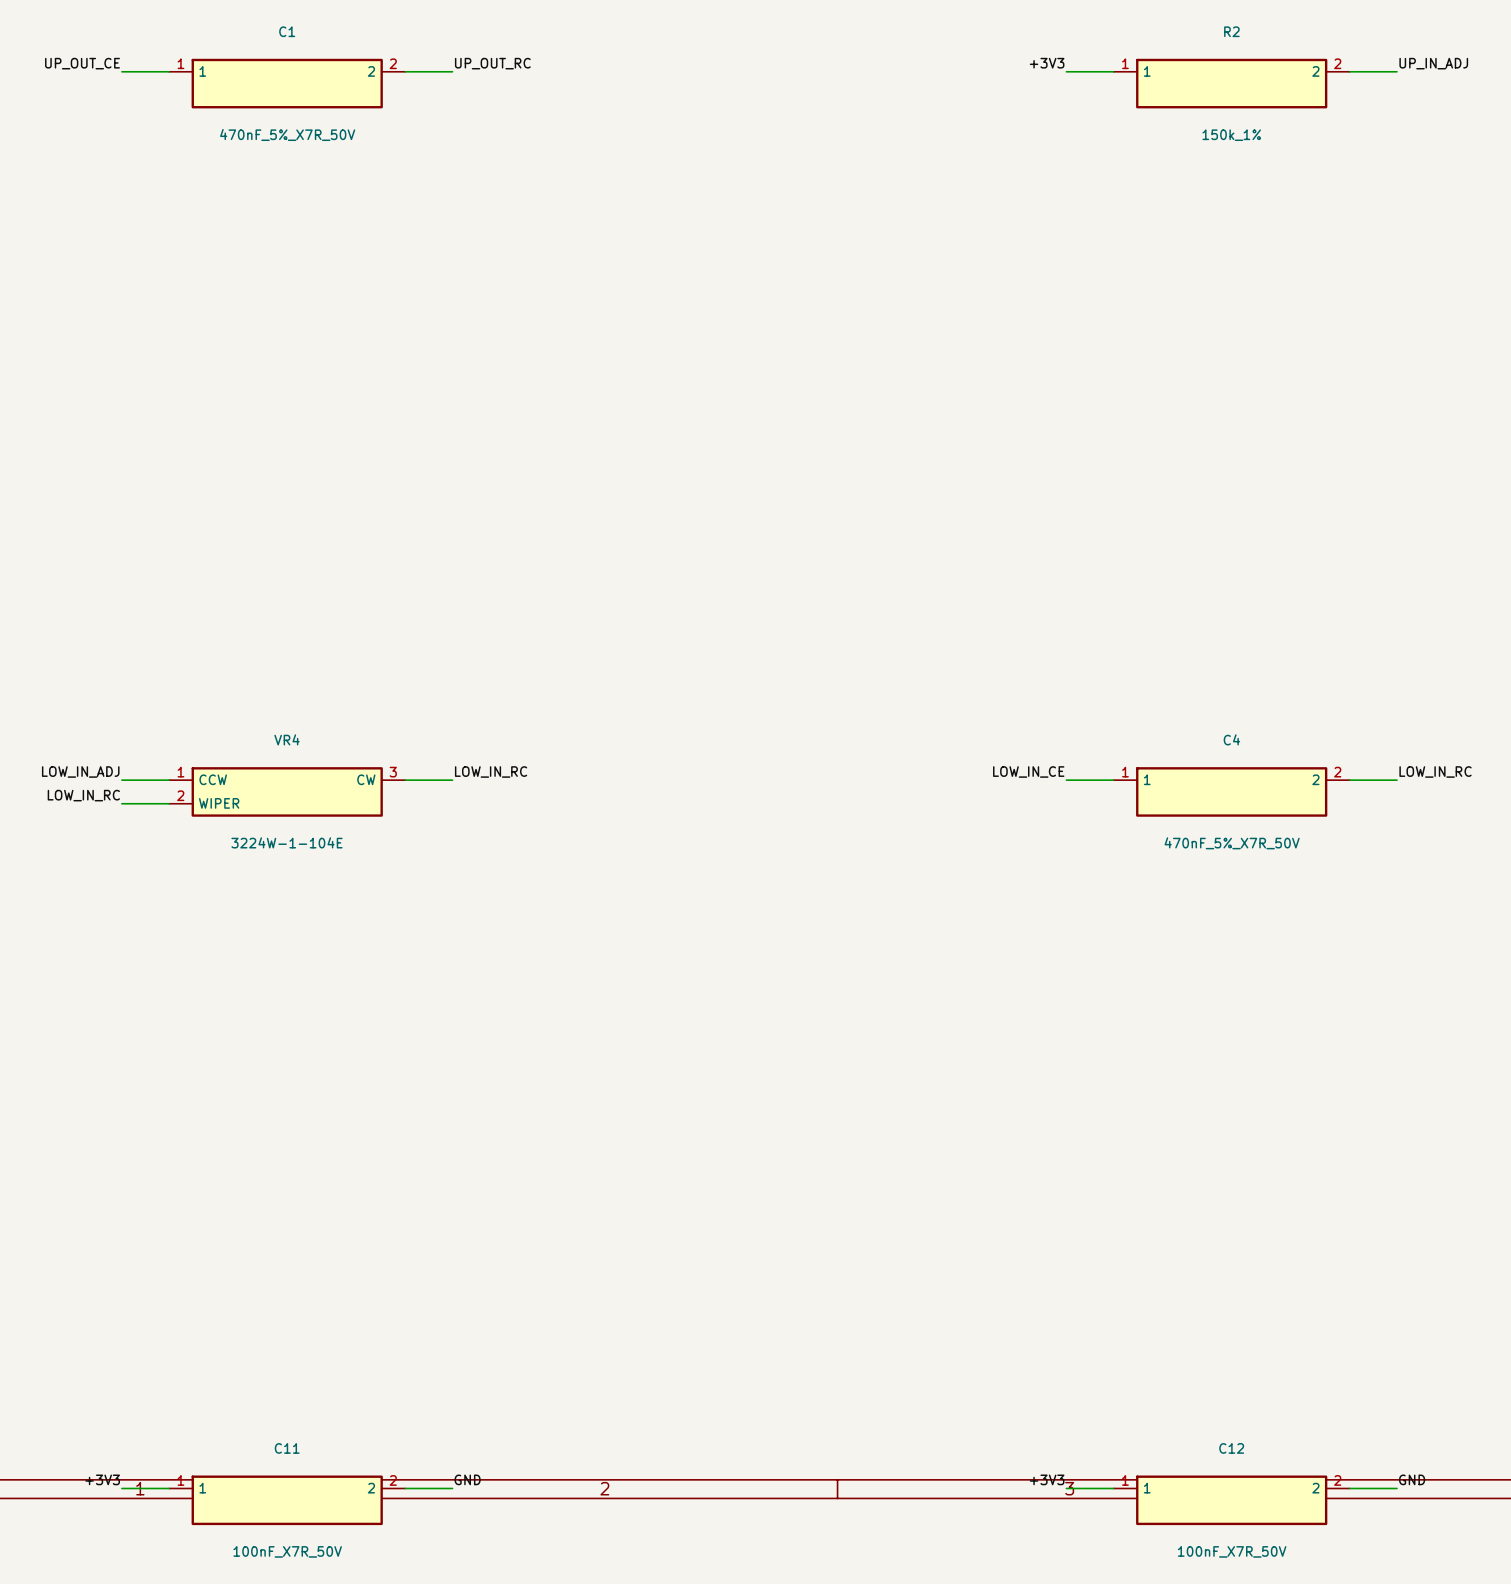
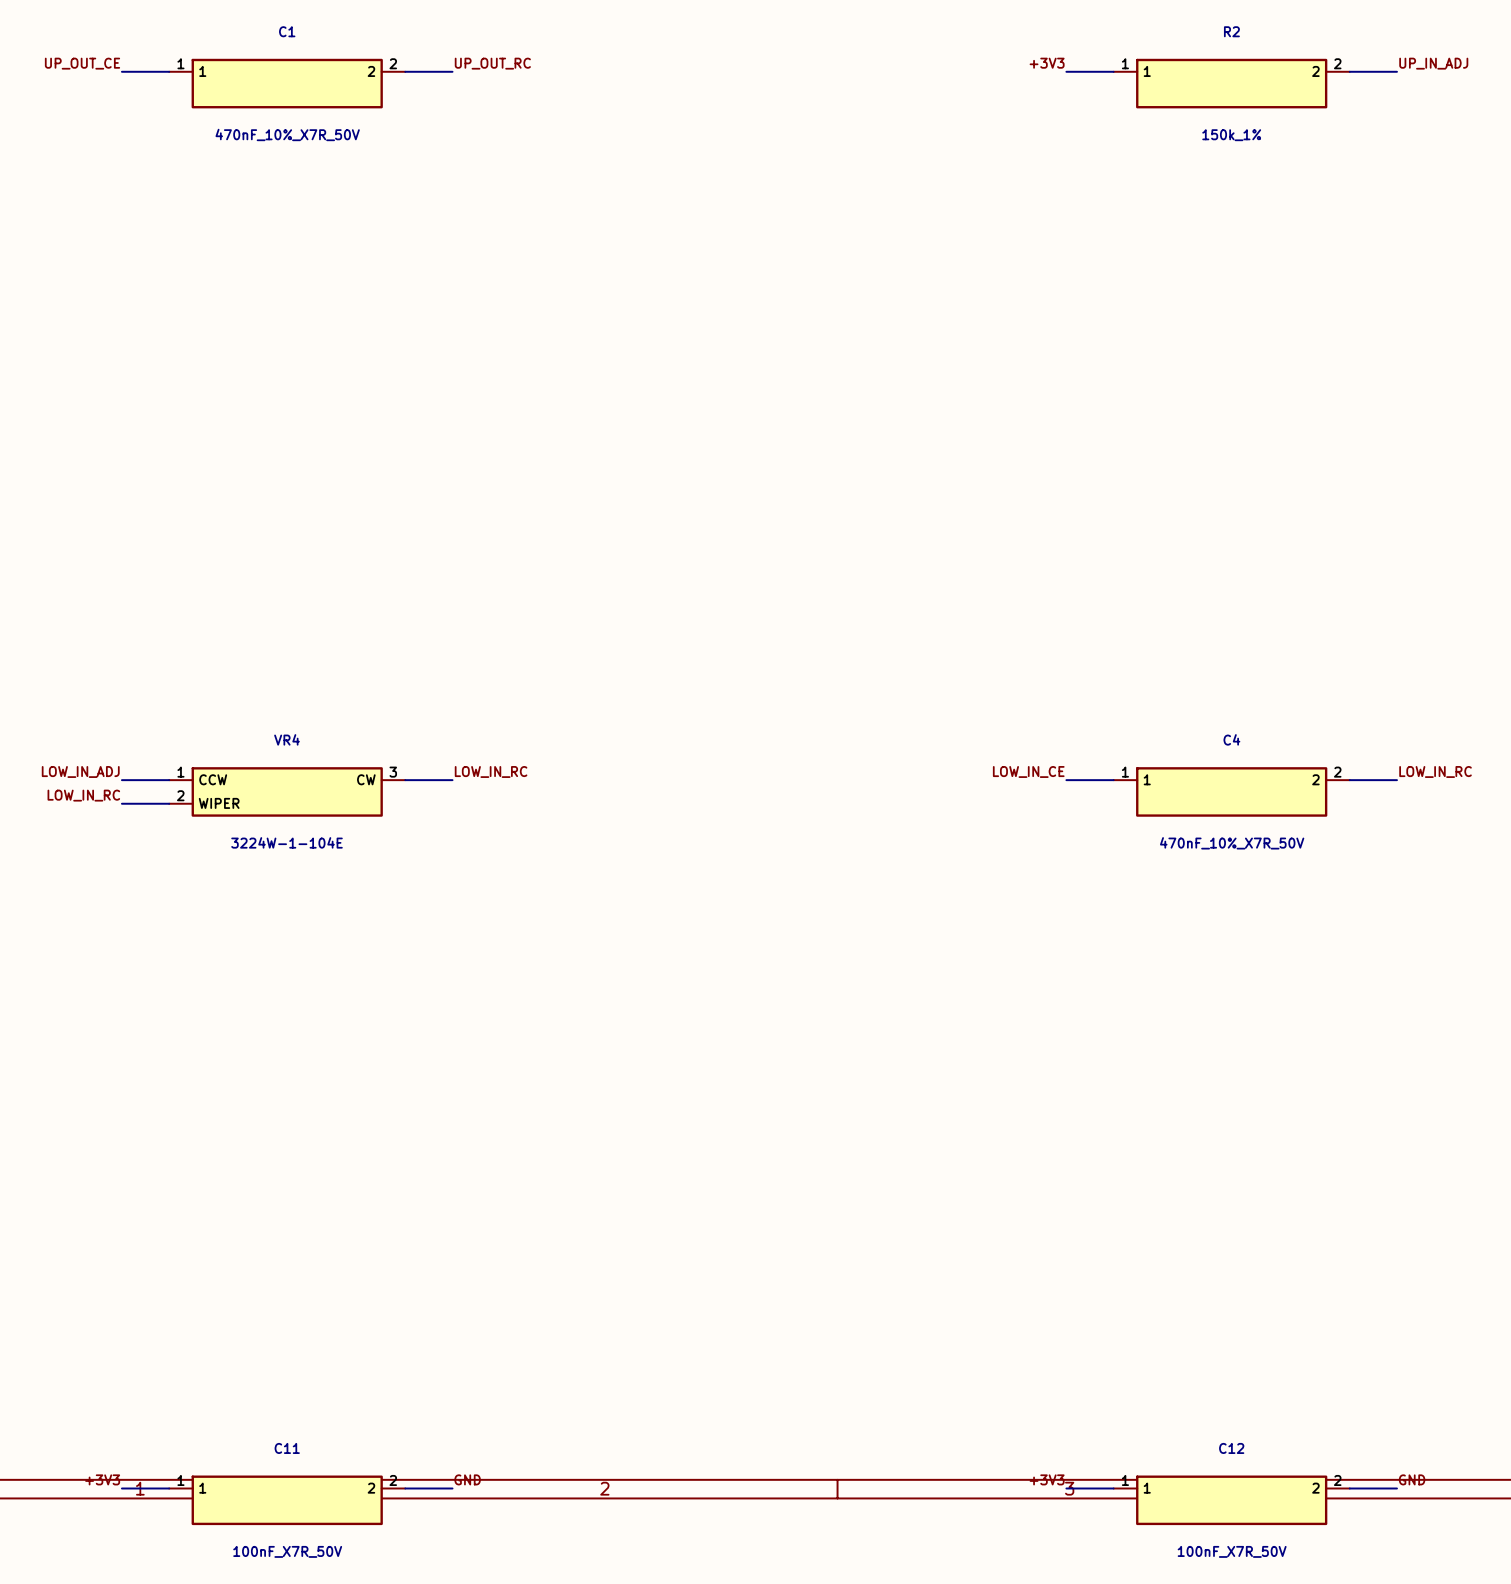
C1 value: 470nF_5%_X7R_50V (287, 134) -> 470nF_10%_X7R_50V (287, 134)
C4 value: 470nF_5%_X7R_50V (1232, 843) -> 470nF_10%_X7R_50V (1232, 843)

